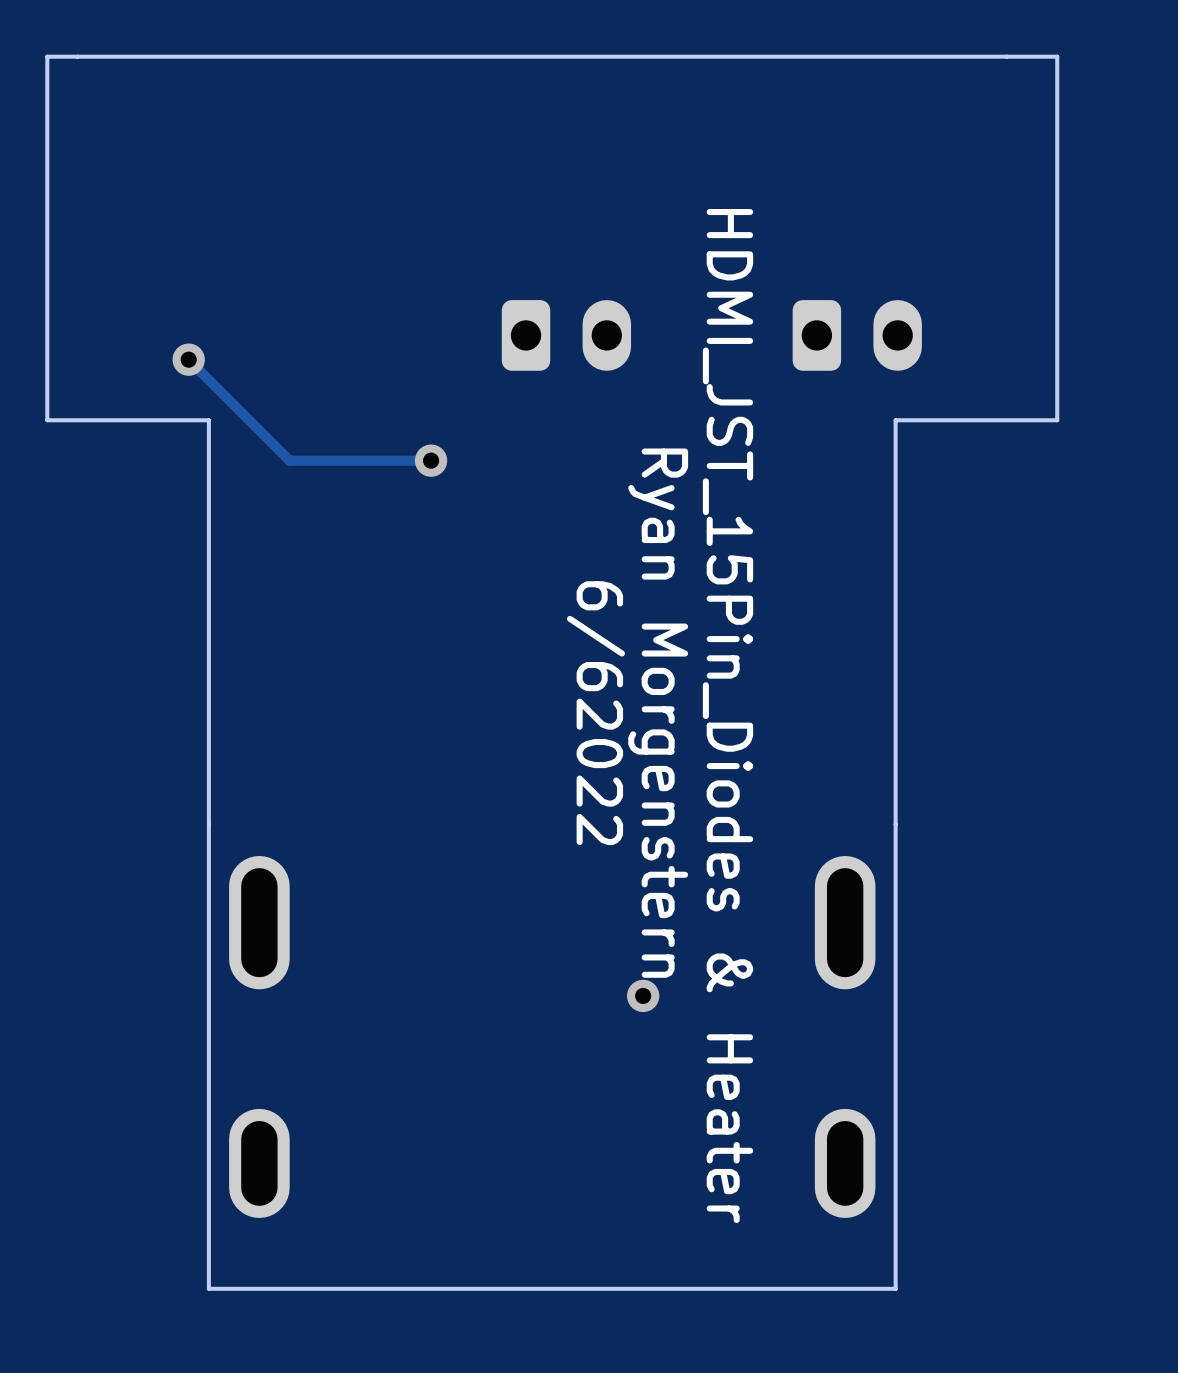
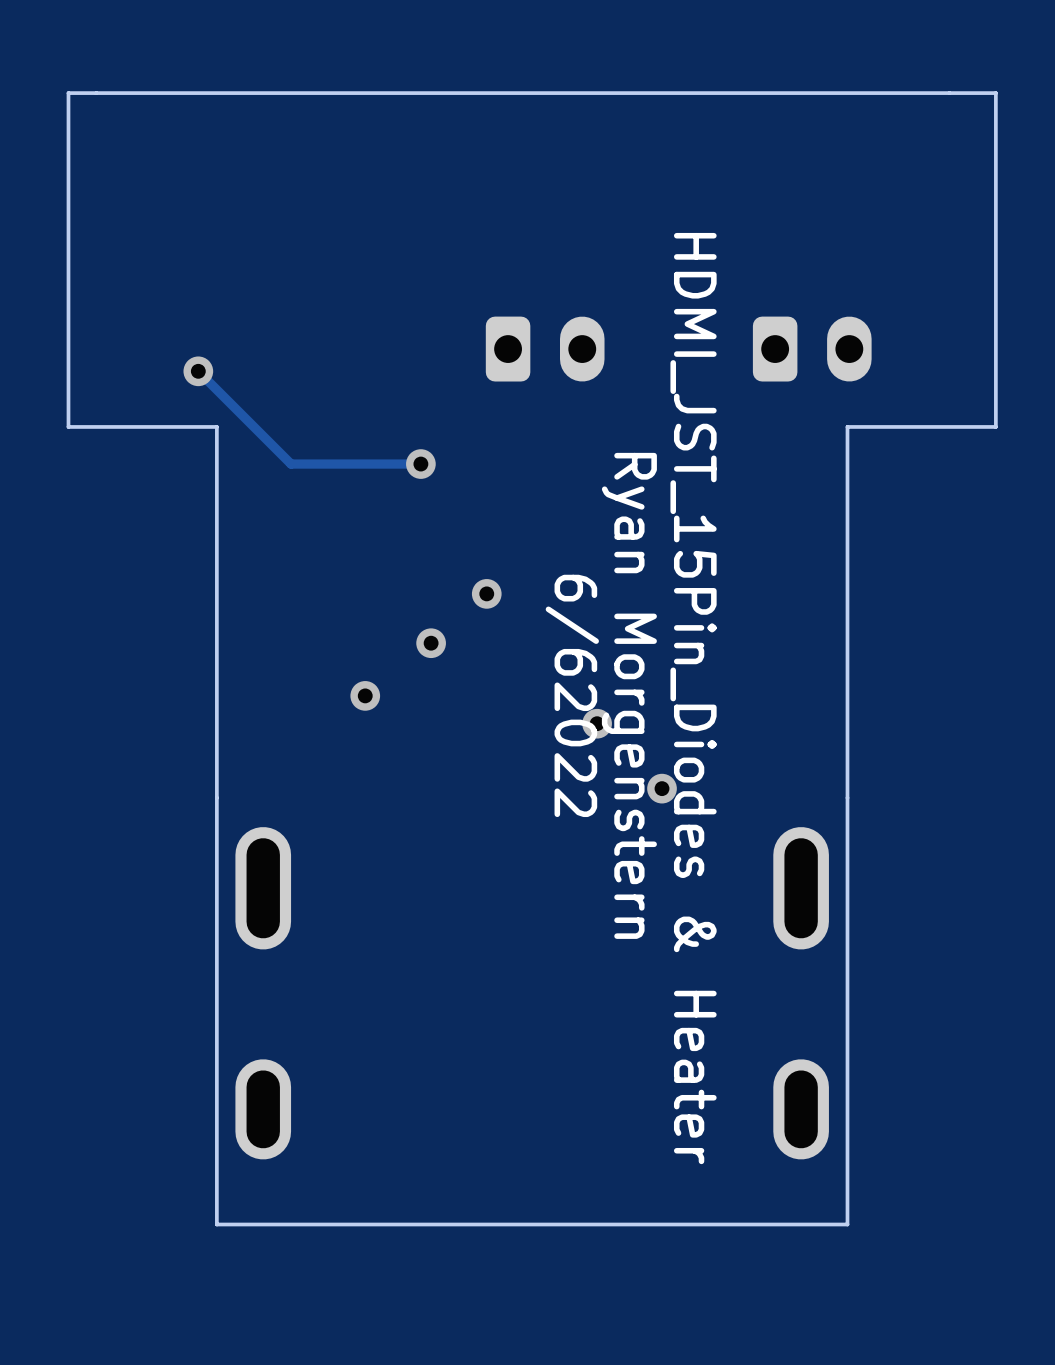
via: none -> (486, 593)
via: none -> (431, 643)
via: none -> (365, 695)
via: none -> (597, 723)
via: none -> (662, 788)
via: (643, 995) -> none

